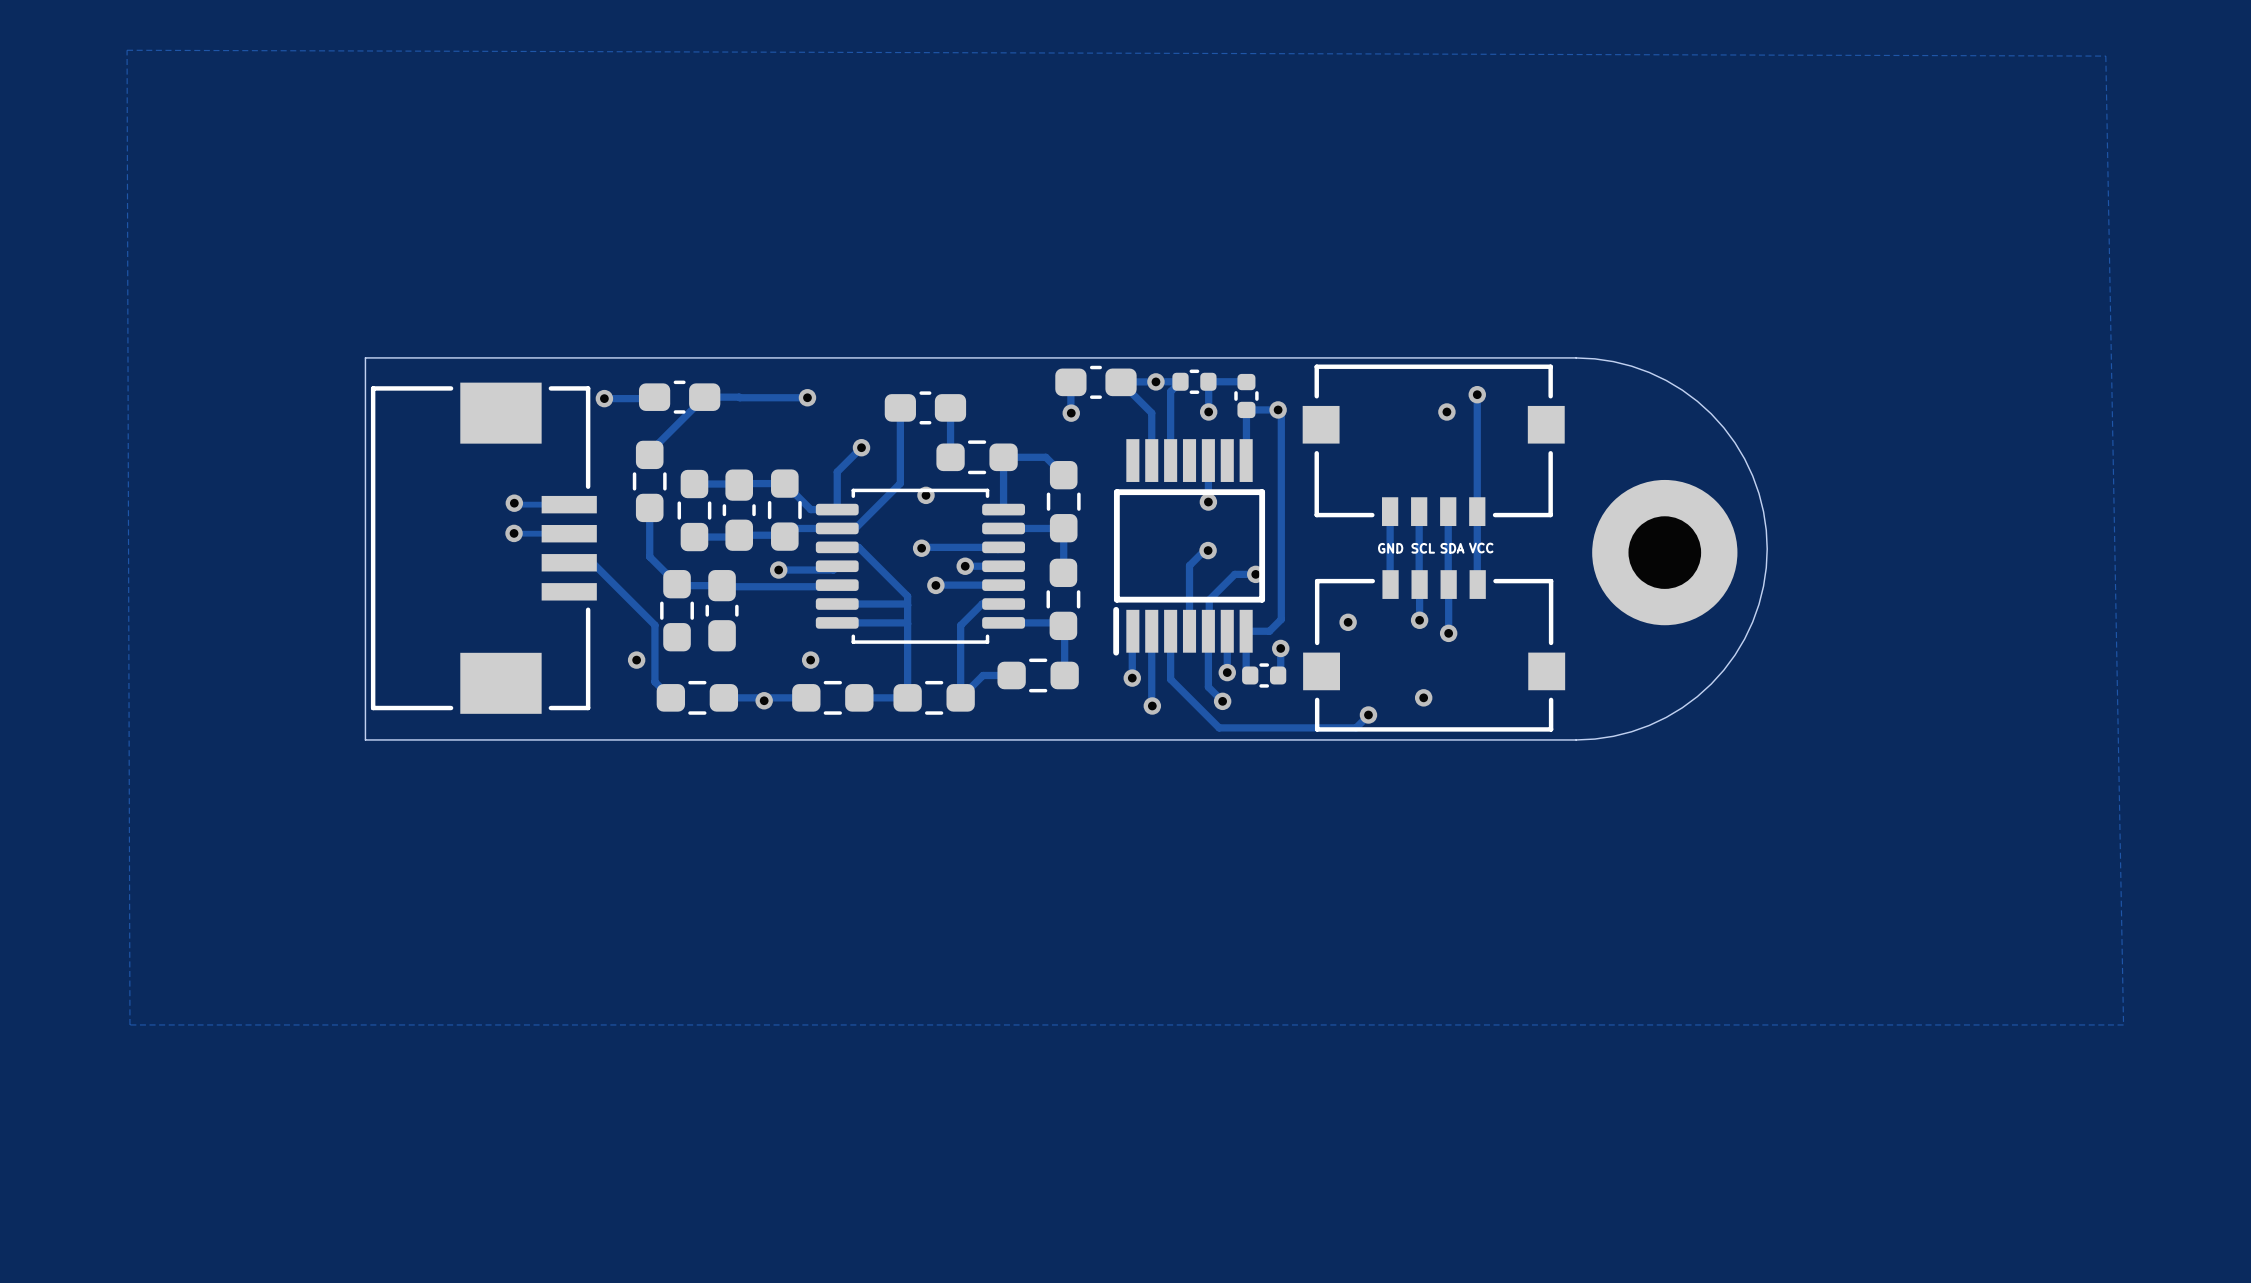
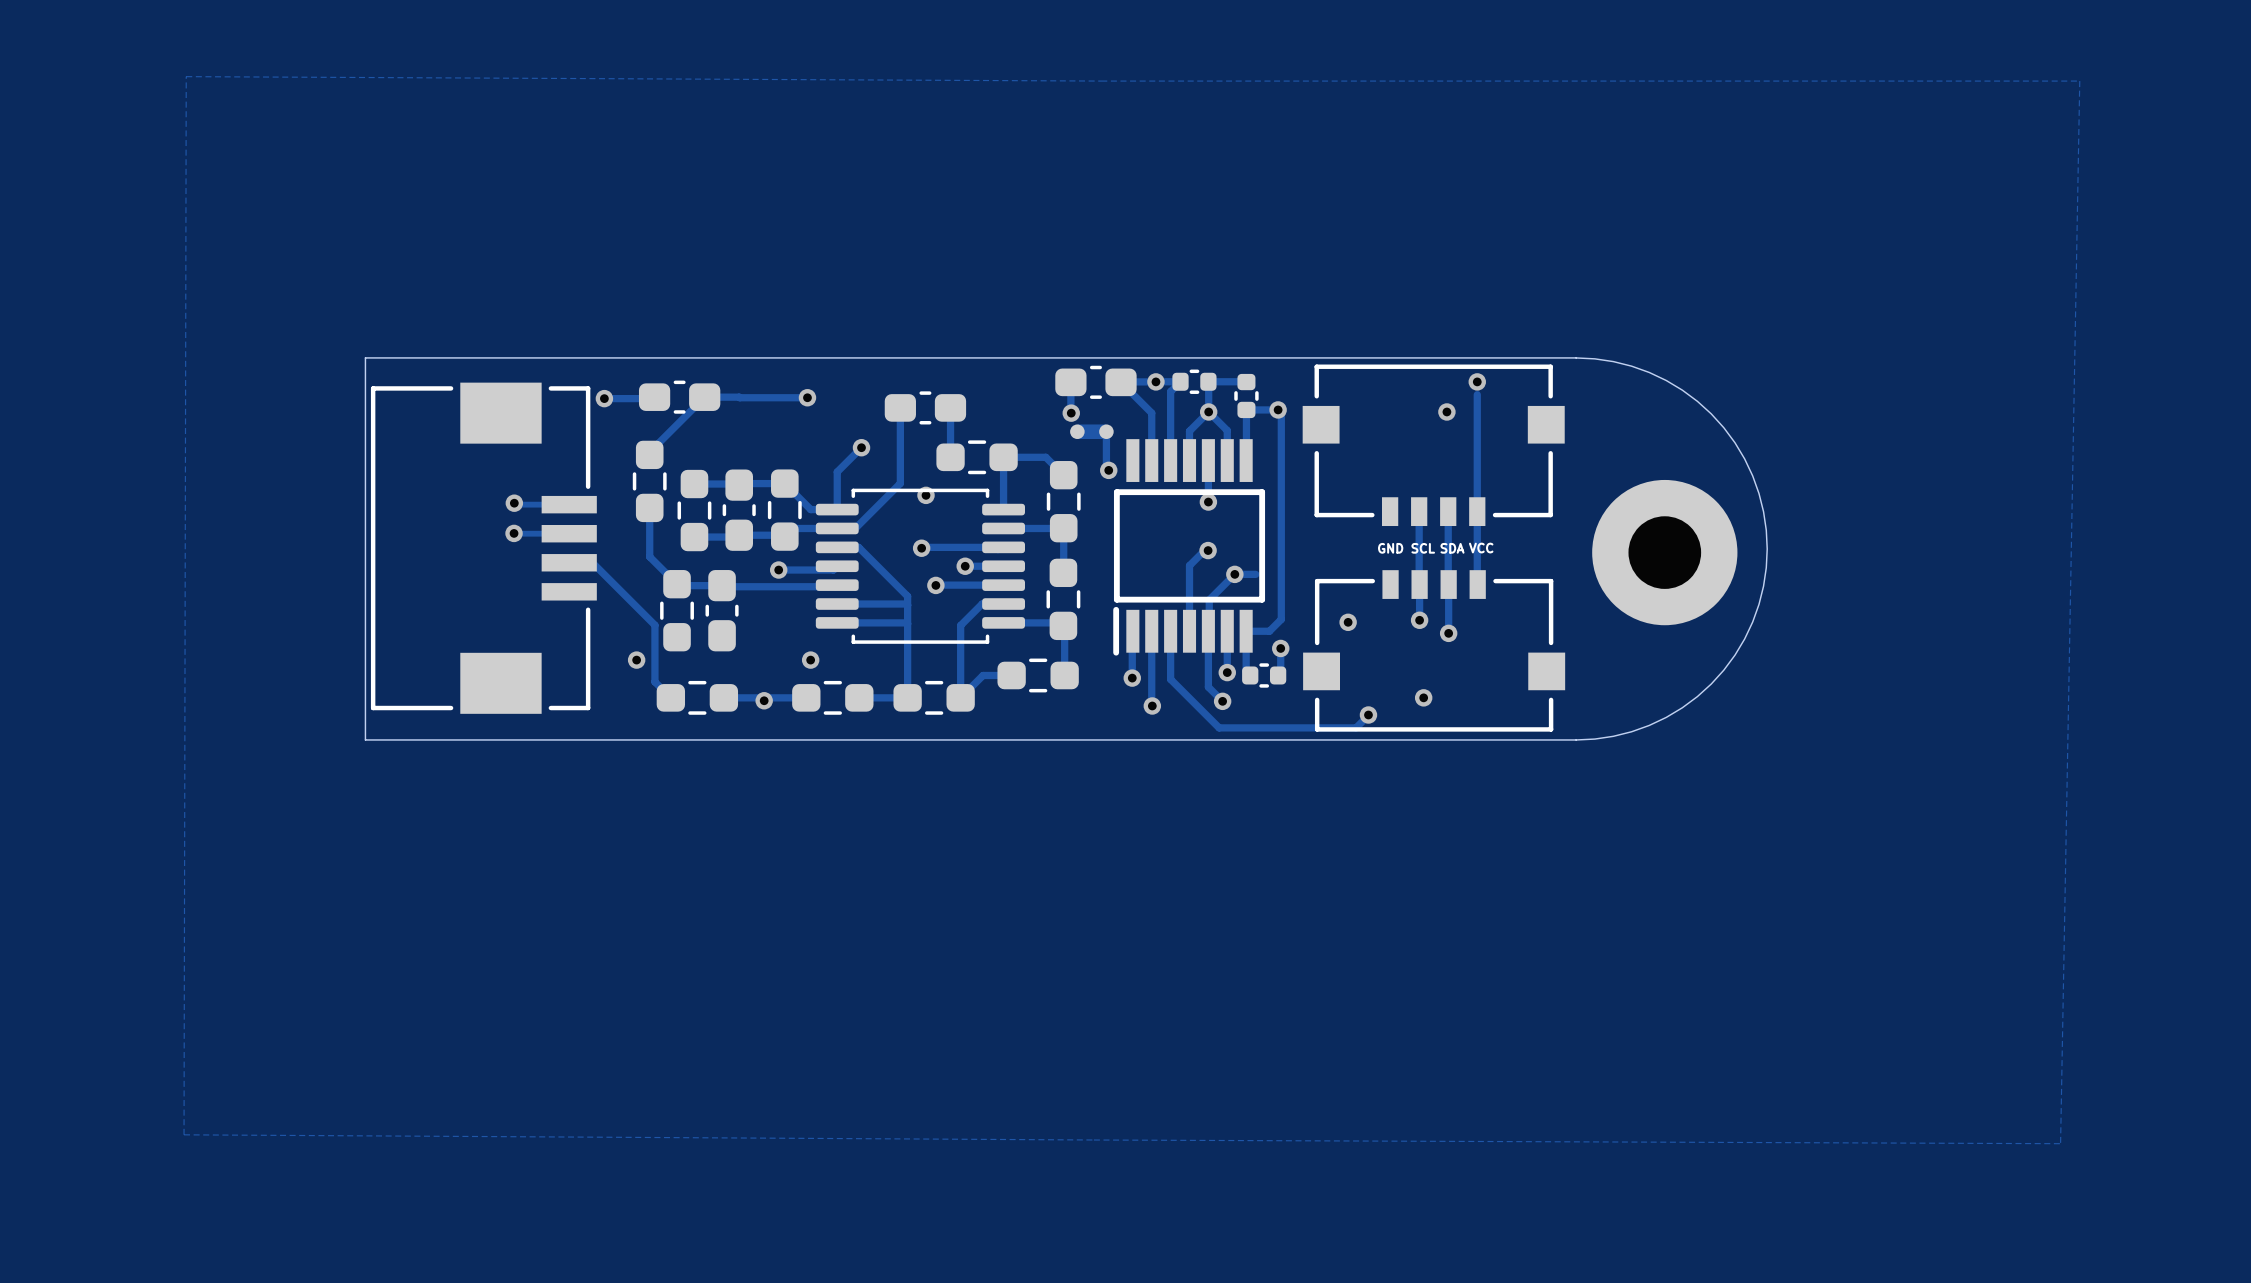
zone outline: (127, 50) (2105, 56) (2123, 1024) (129, 1024) (127, 50) -> (186, 76) (184, 1134) (2060, 1143) (2079, 81) (1101, 81) (186, 76)
via position: (1477, 394) -> (1477, 381)
part: none -> (1091, 431)
track: none -> (1106, 431) (1106, 468) (1108, 470)
track: none -> (1189, 460) (1189, 431) (1208, 411) (1227, 430) (1227, 460)
via: none -> (1108, 470)
track: (1390, 511) (1390, 584) -> none
via position: (1255, 574) -> (1234, 574)

